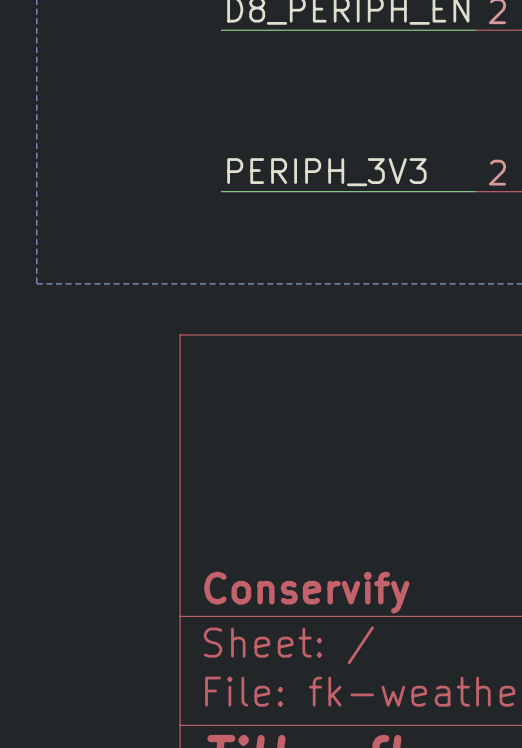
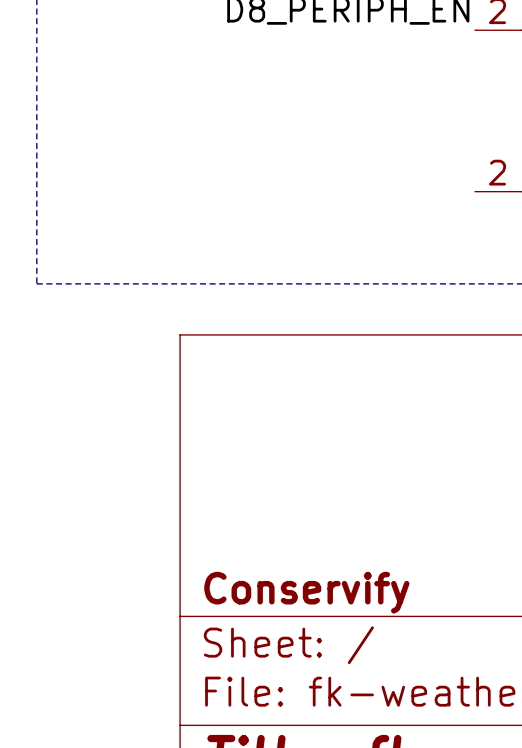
wire: (221, 30) (474, 30) -> none
label: PERIPH_3V3 (326, 172) -> none
wire: (221, 191) (474, 191) -> none

